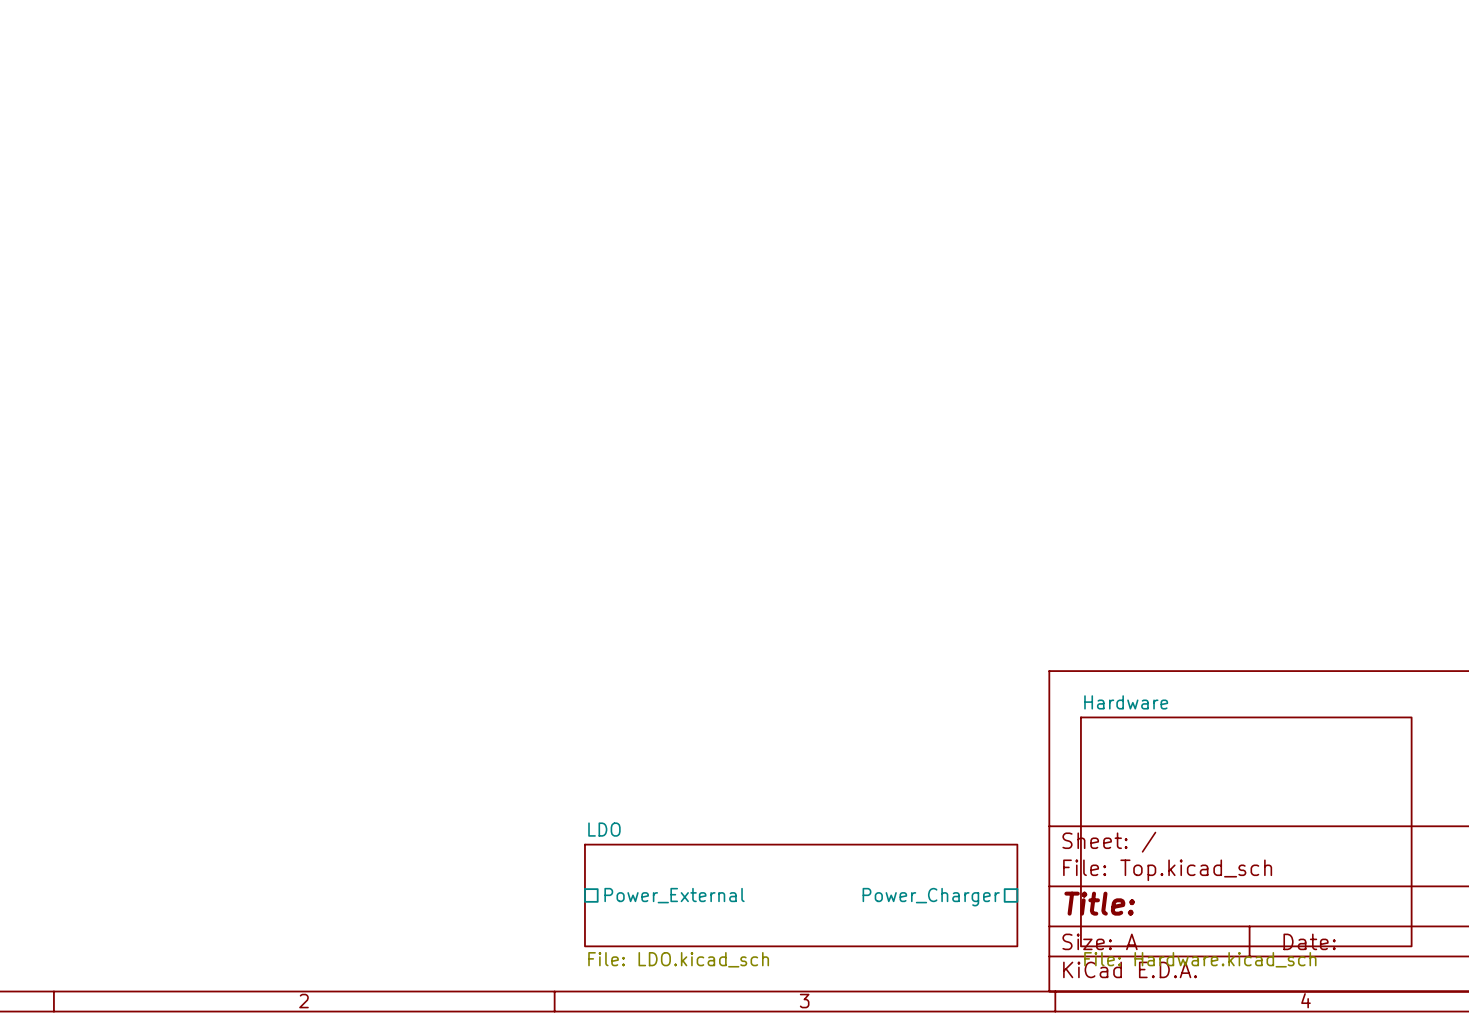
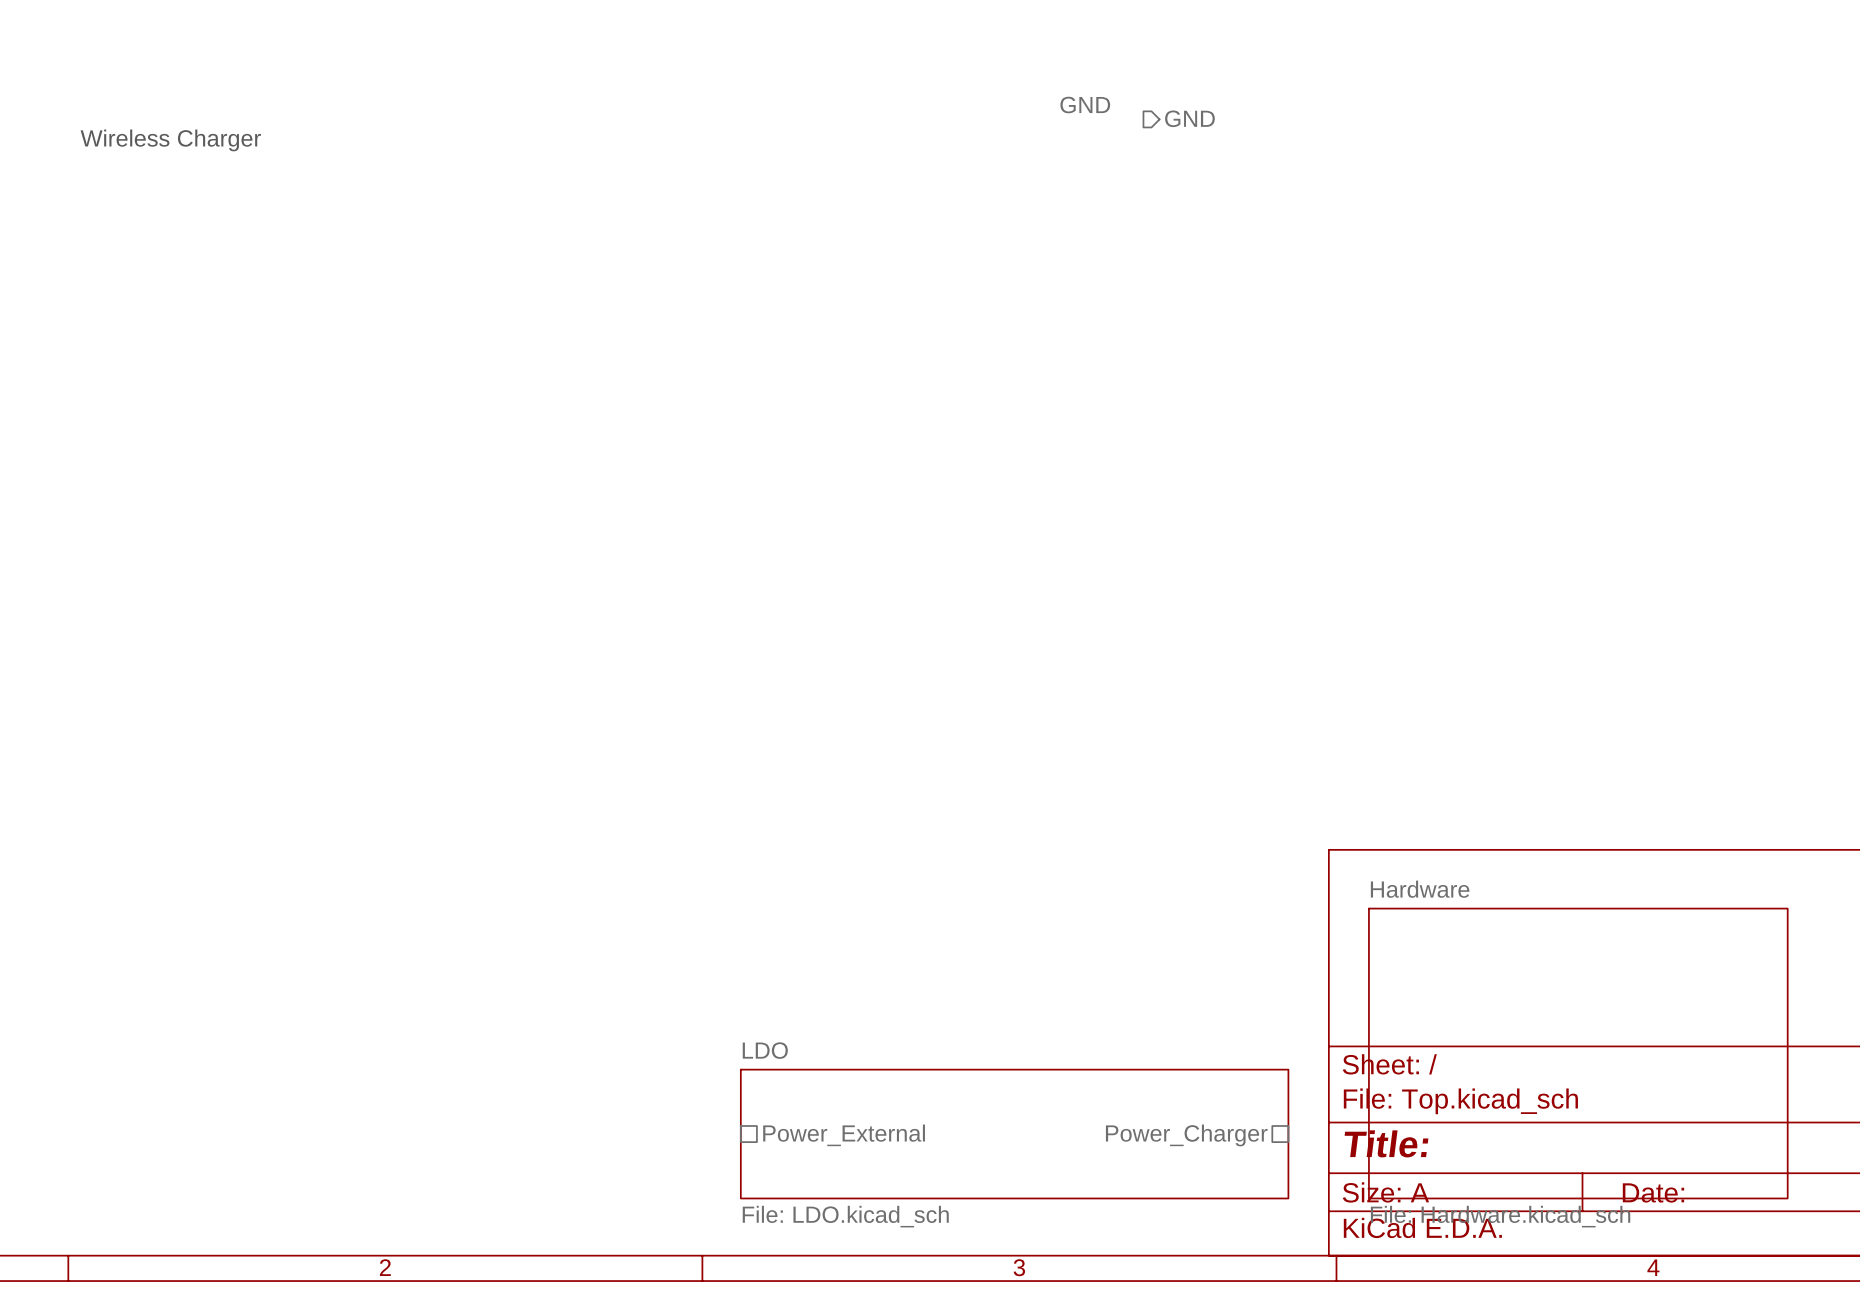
label: none -> GND (1085, 105)
sheet pin: none -> GND (1189, 118)
text: none -> Wireless Charger (170, 140)

